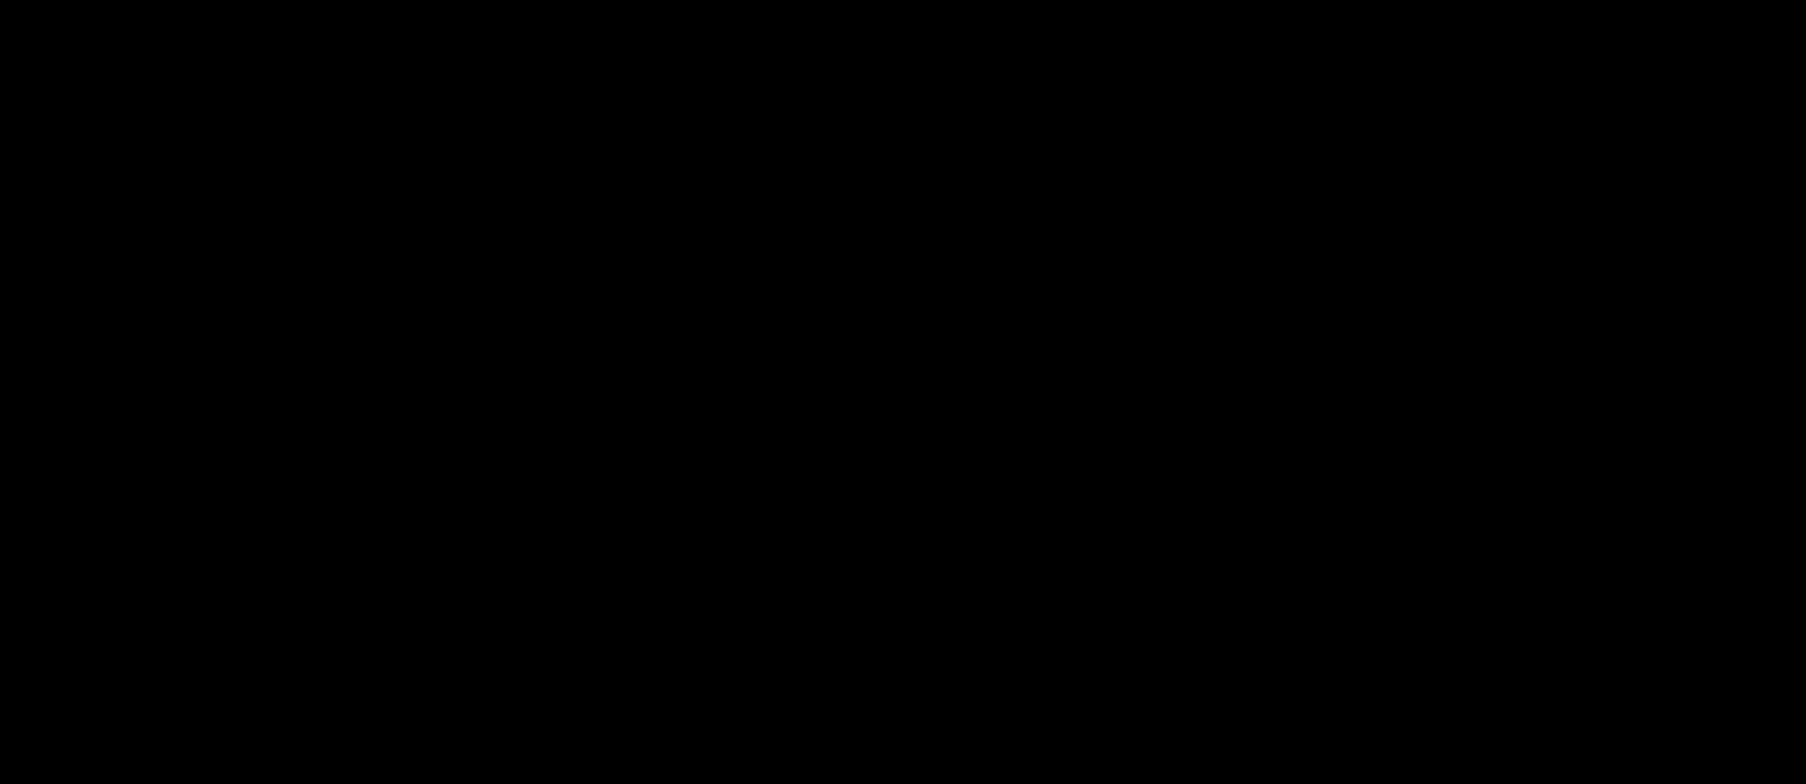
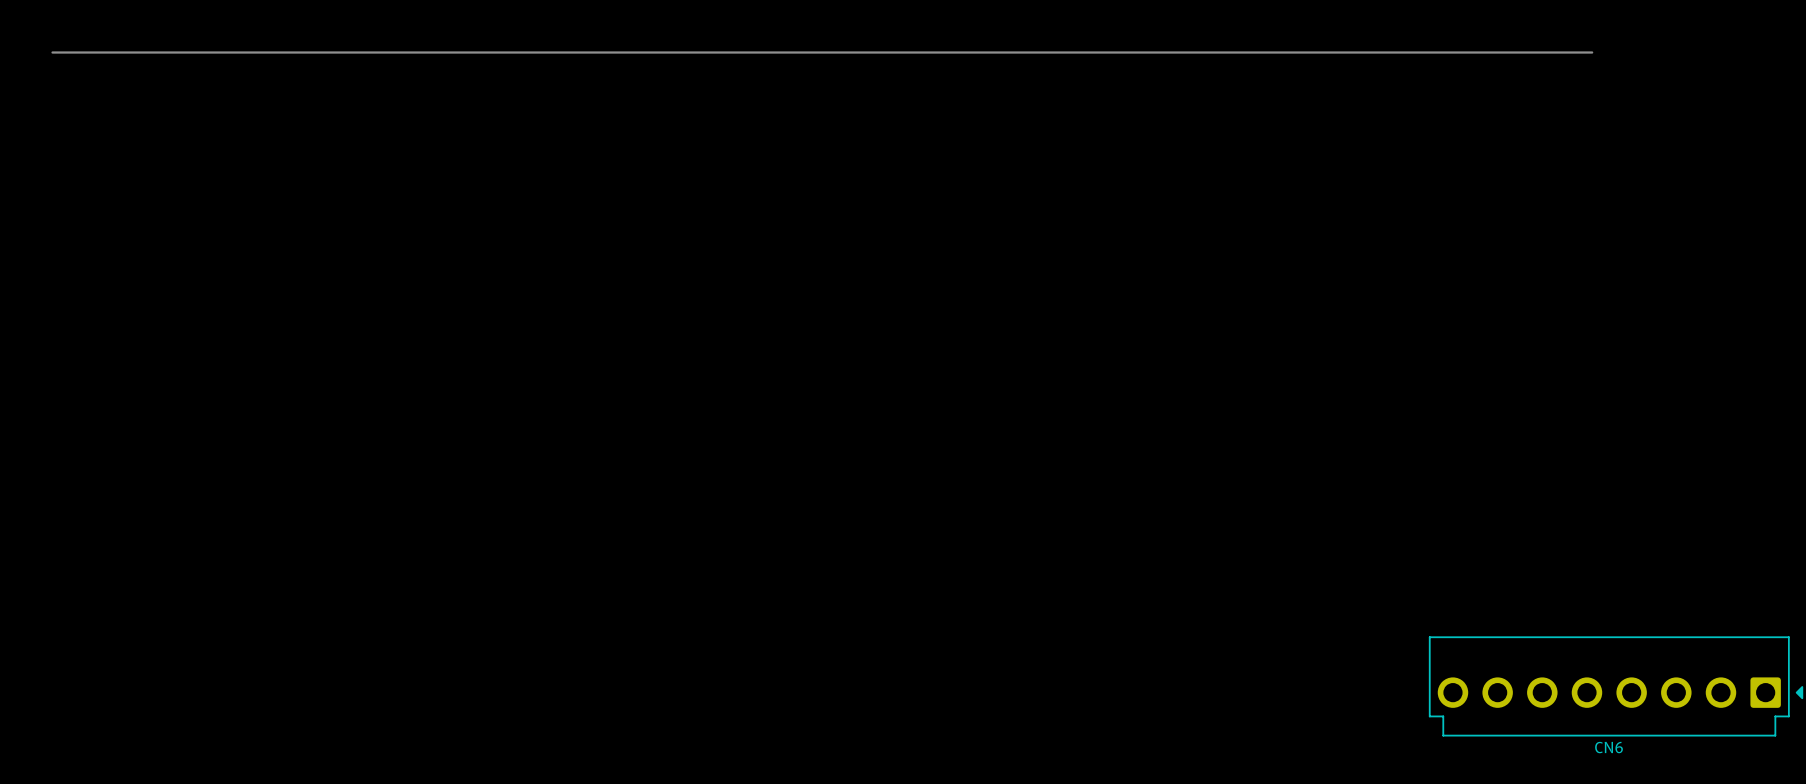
line: none -> (52, 52) (1592, 52)
CN6: none -> (1616, 686)

